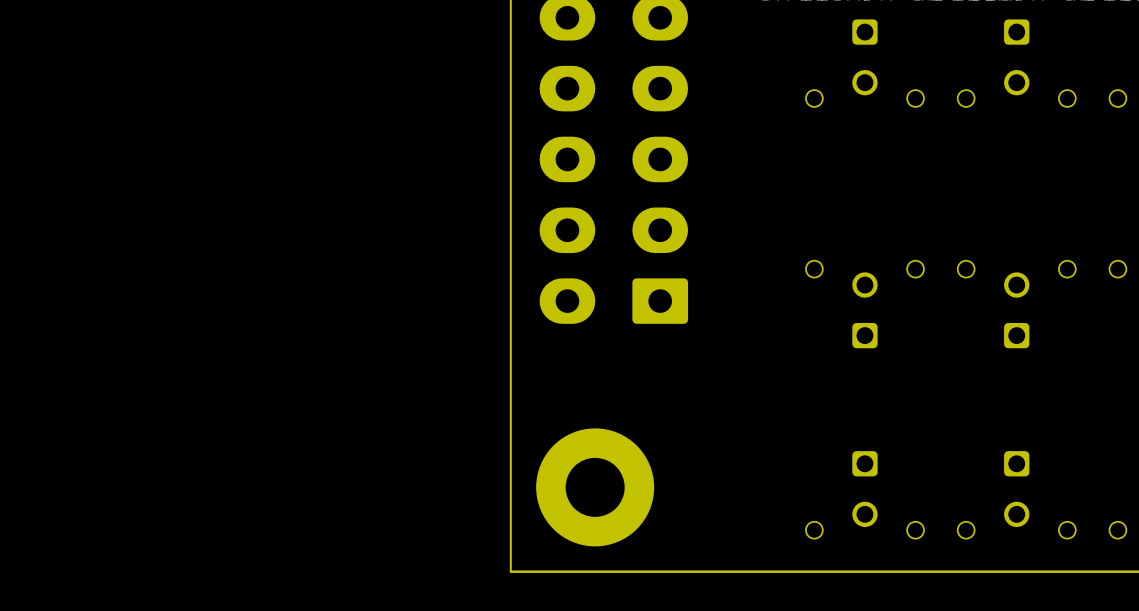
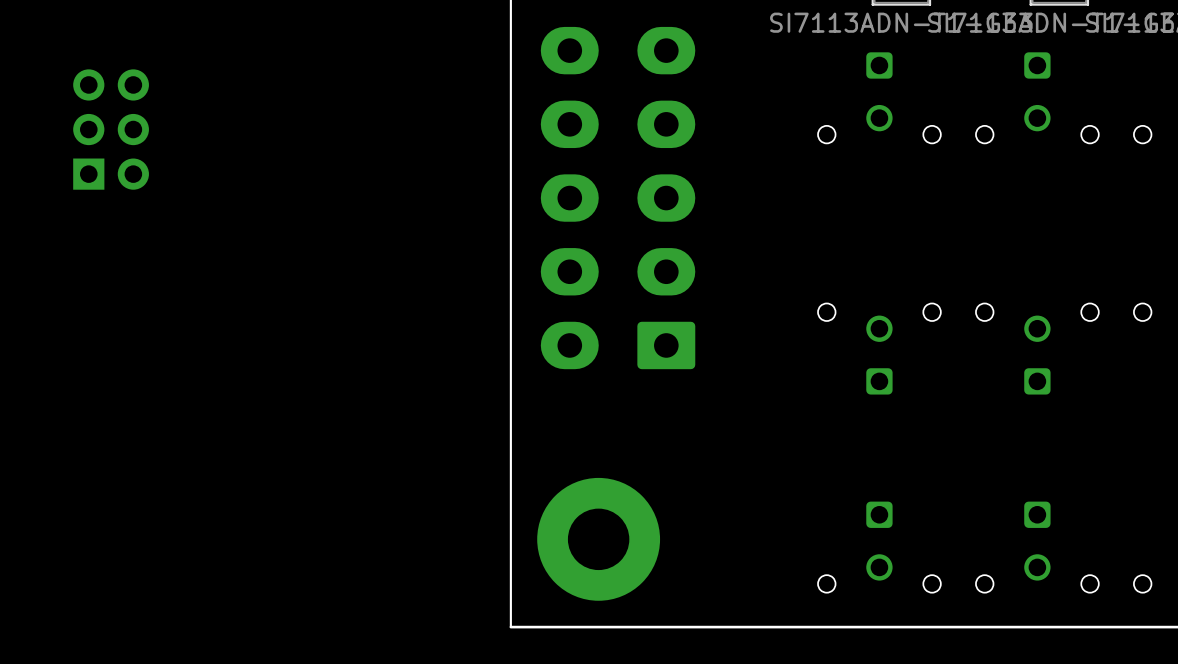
part: none -> (111, 129)

